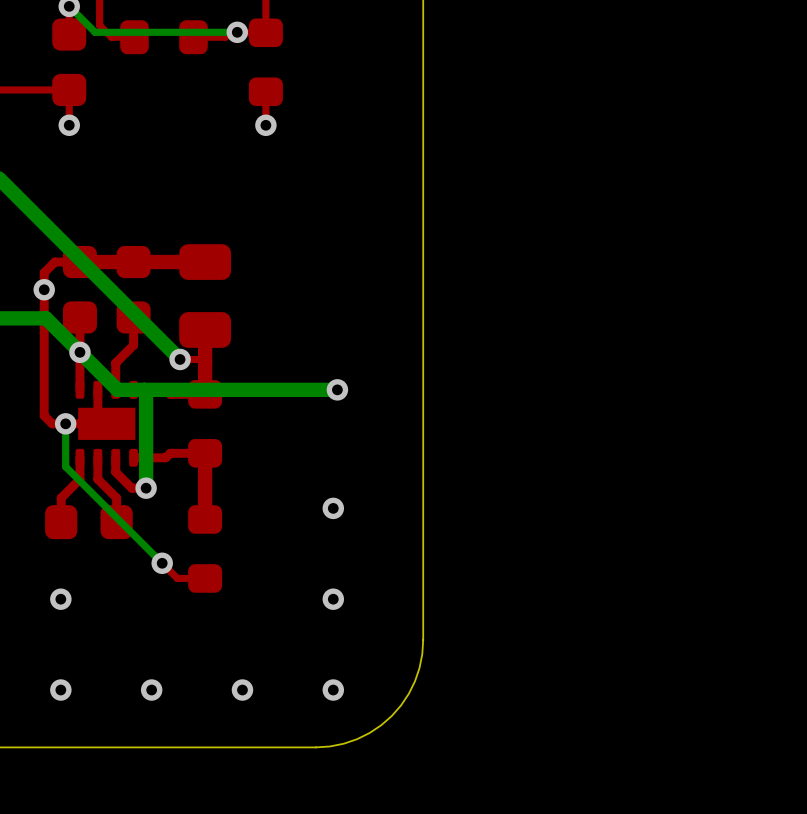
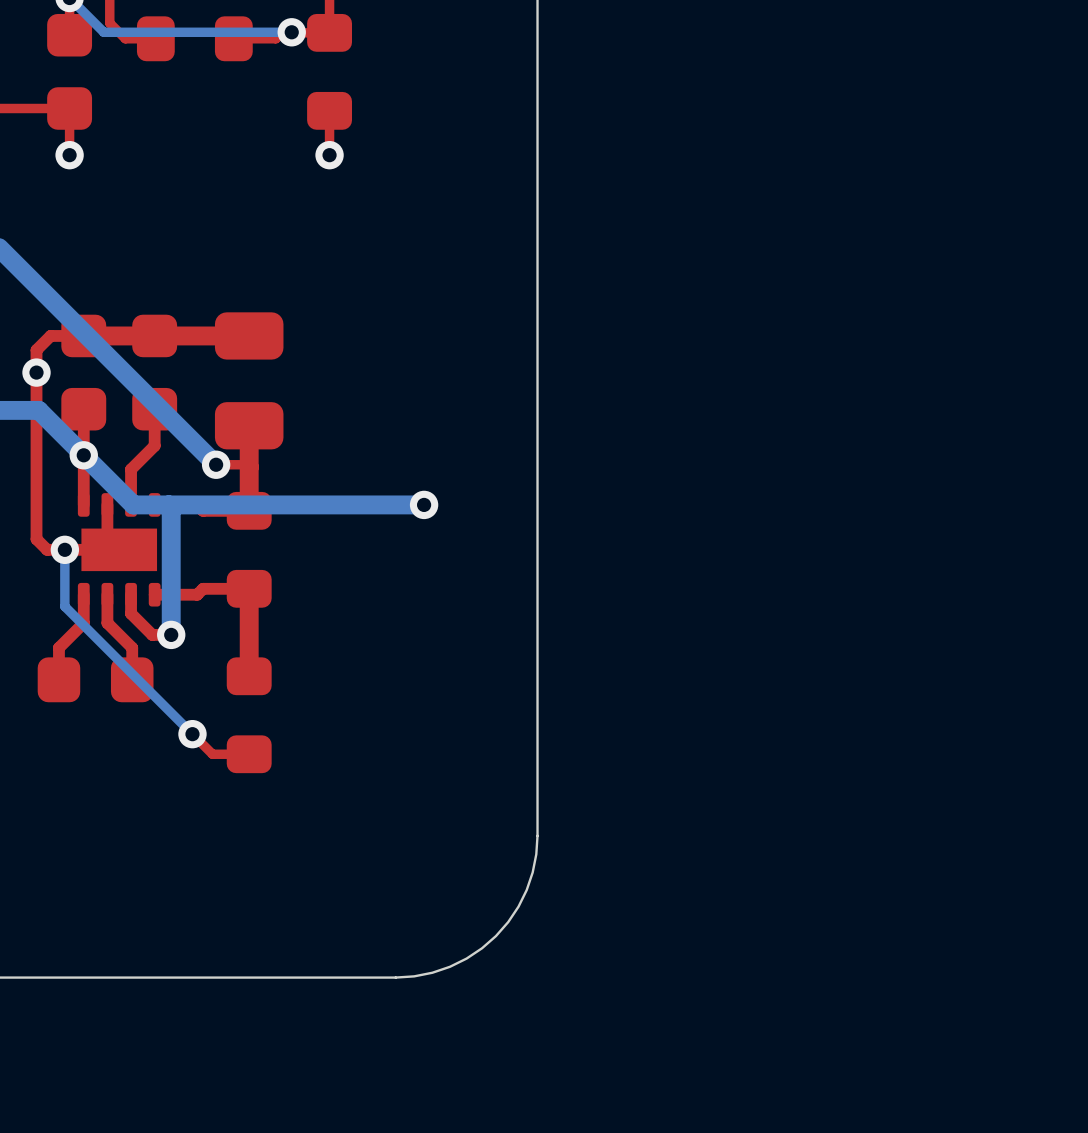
via: (333, 508) -> none
via: (60, 599) -> none
via: (333, 599) -> none
via: (60, 690) -> none
via: (151, 690) -> none
via: (242, 690) -> none
via: (333, 690) -> none

